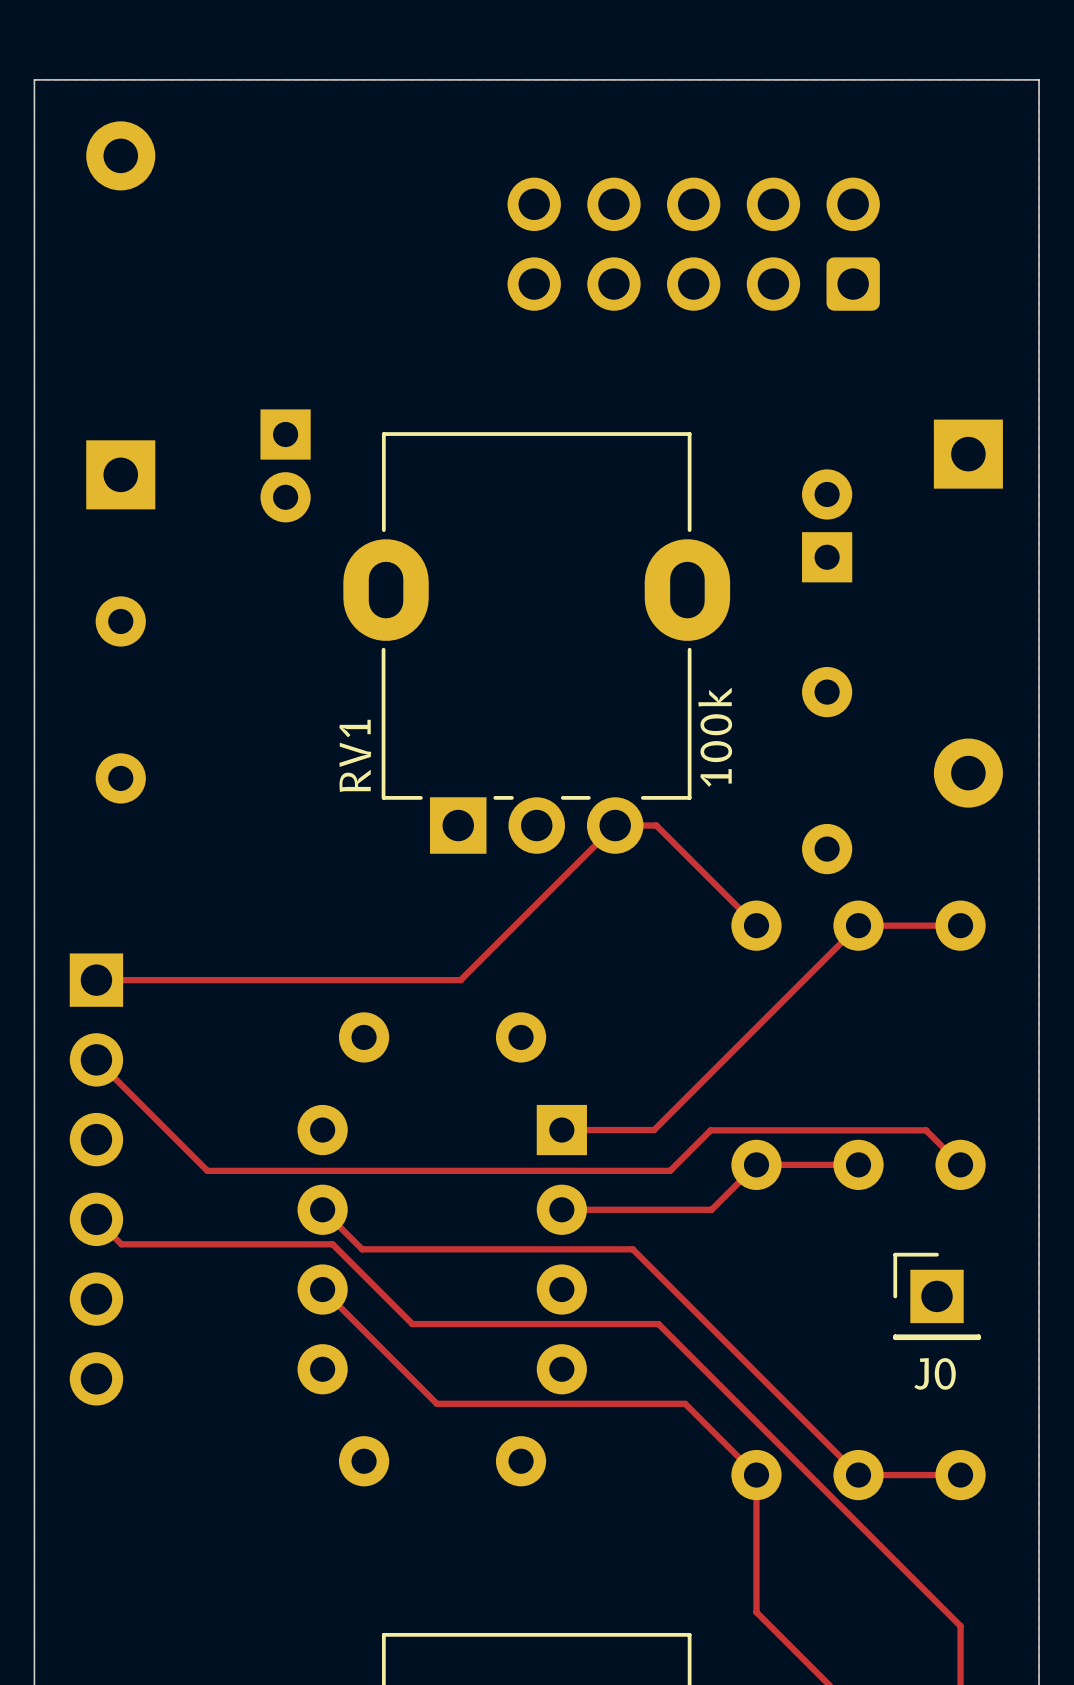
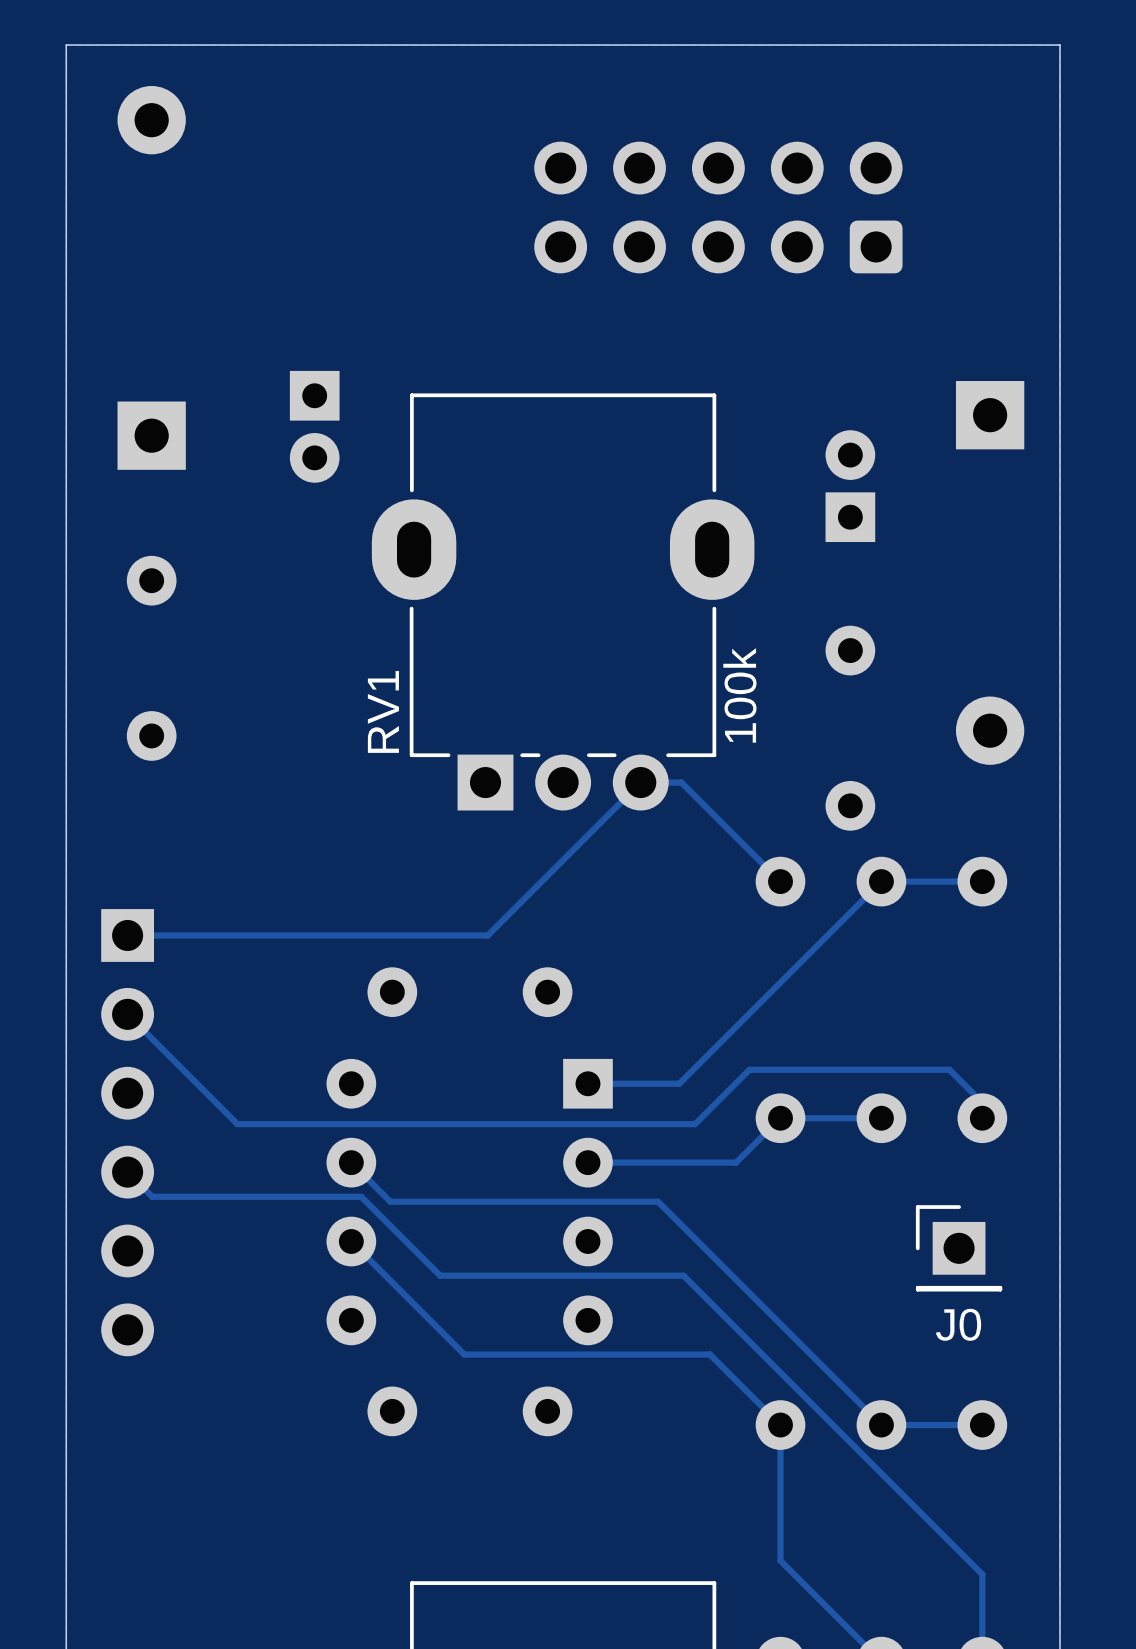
track: (710, 1130) (926, 1130) (960, 1164) -> (735, 1084) (749, 1069) (949, 1069) (997, 1118)

